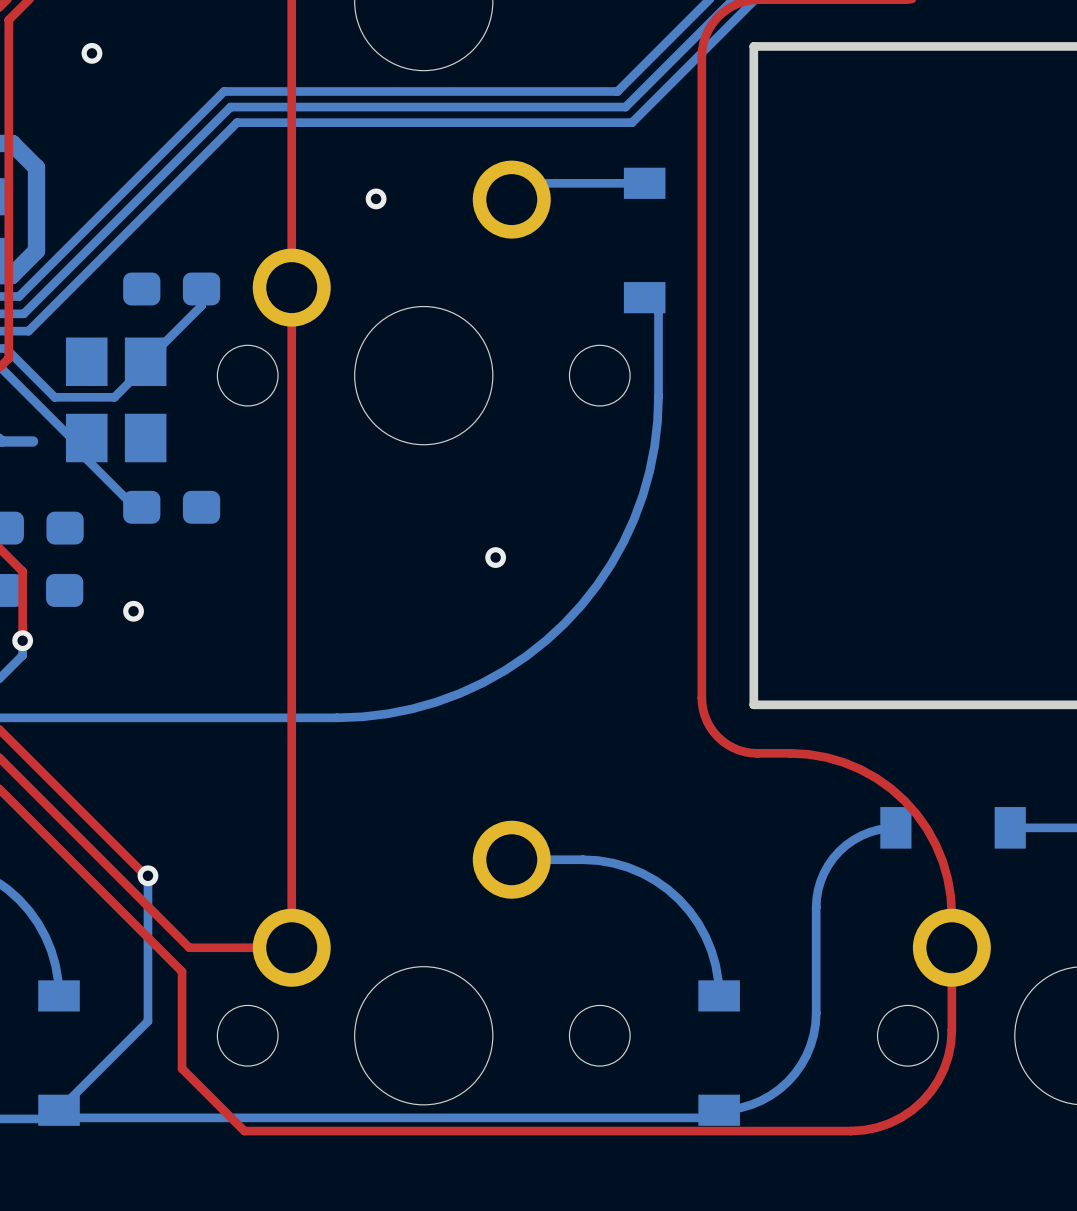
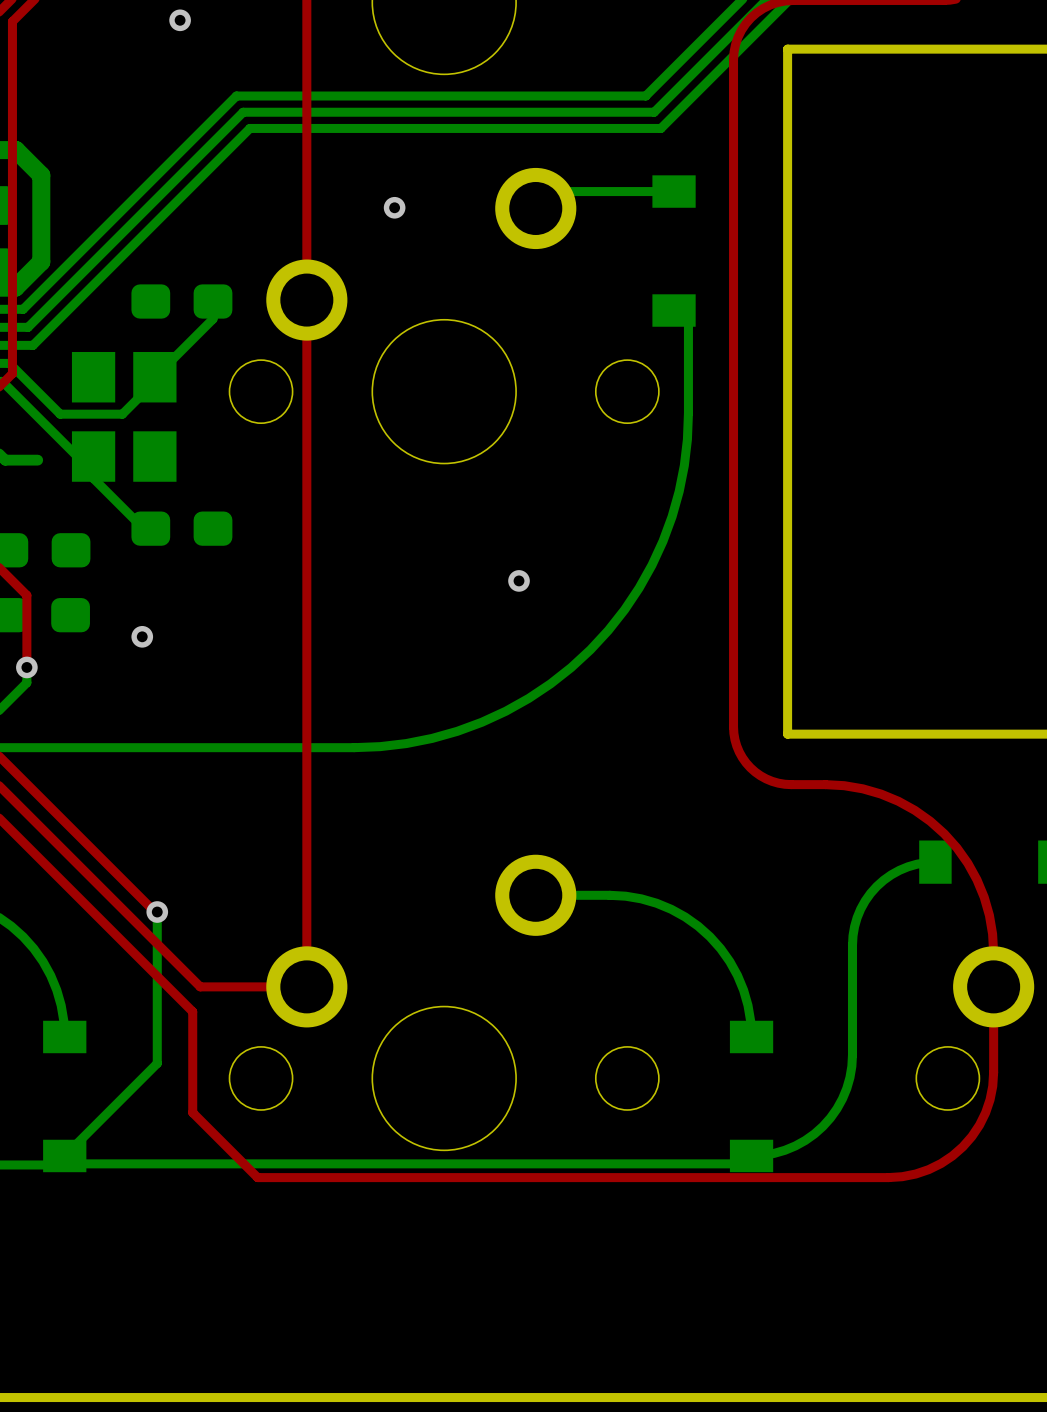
via position: (91, 53) -> (180, 20)

